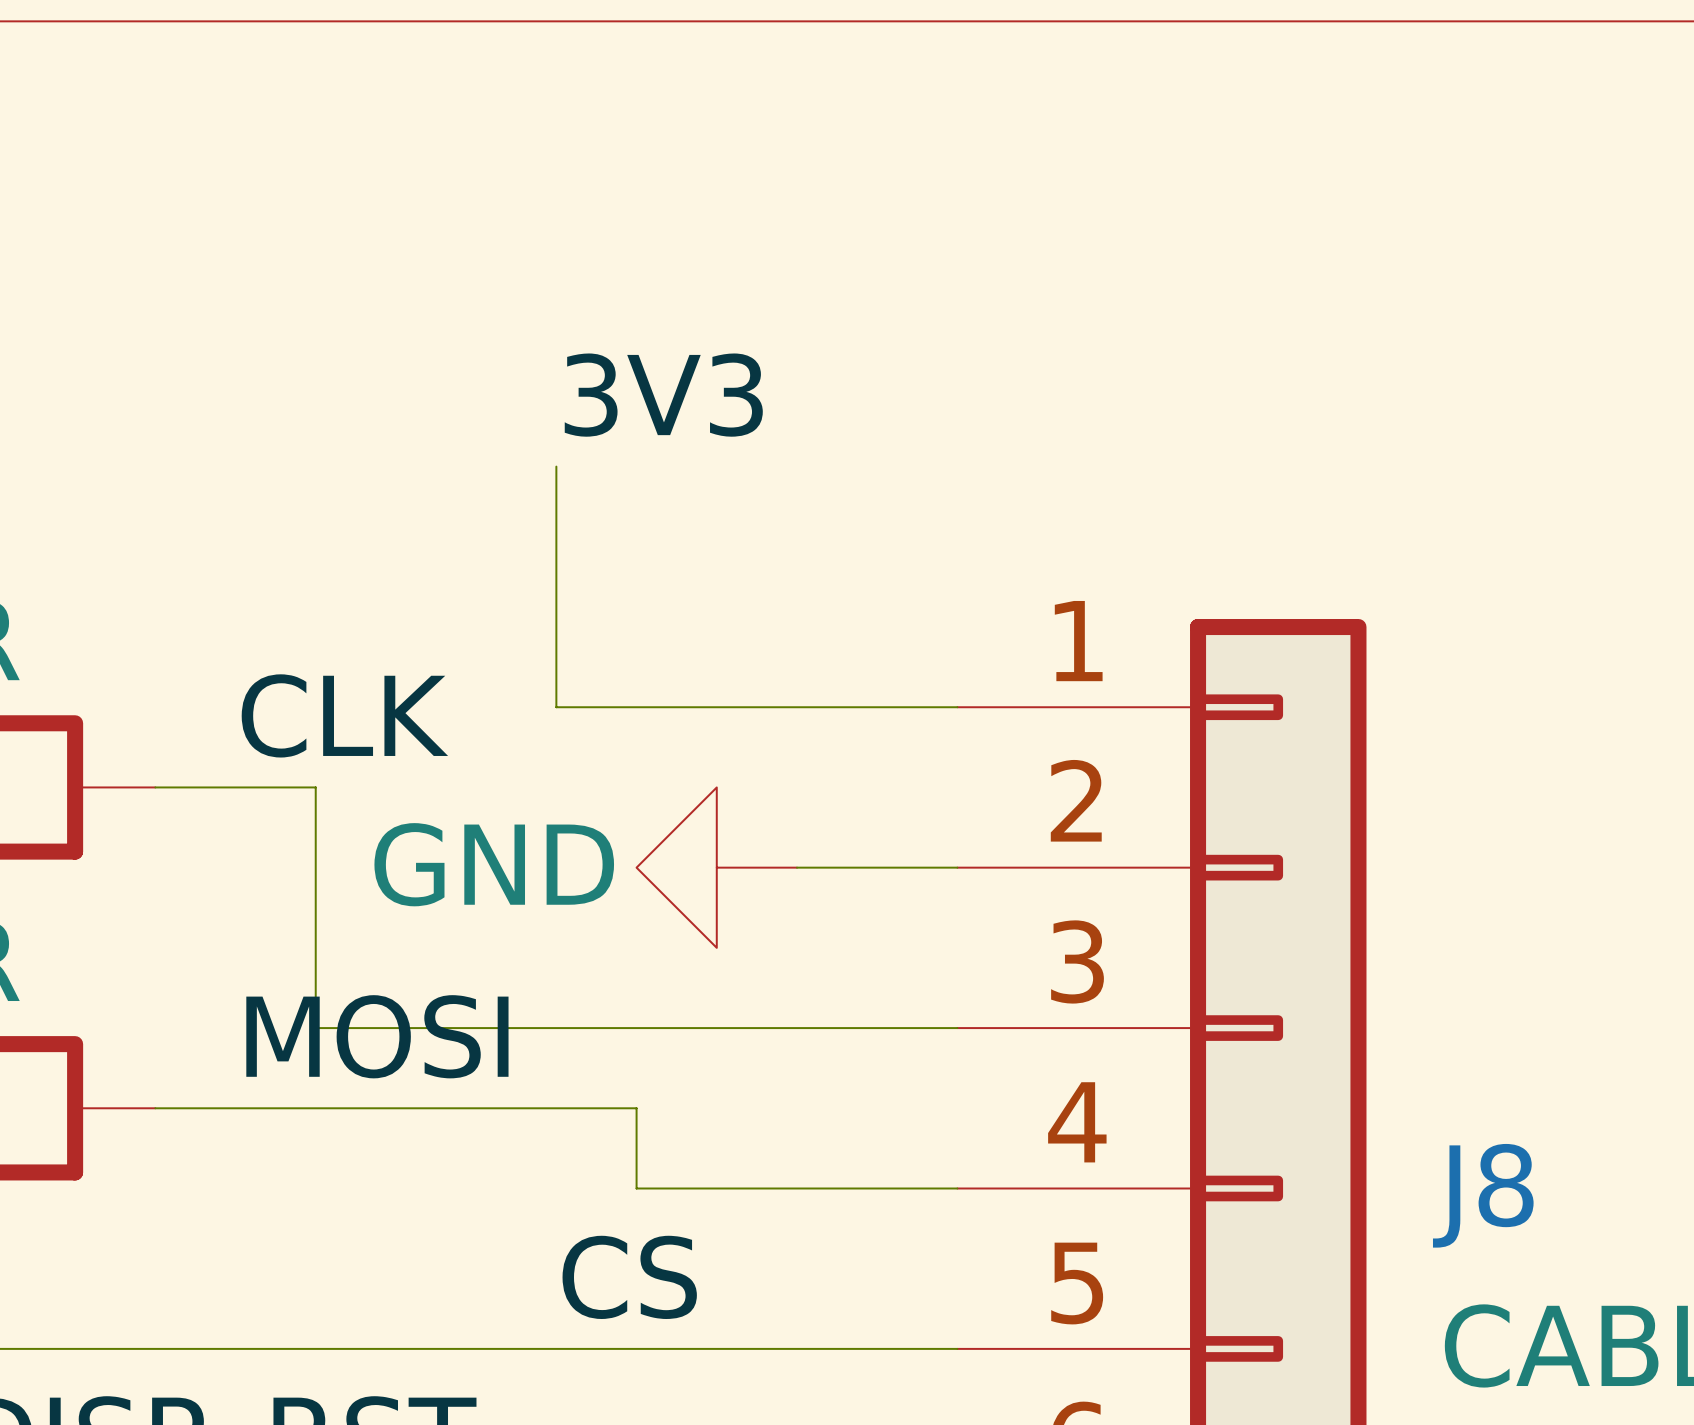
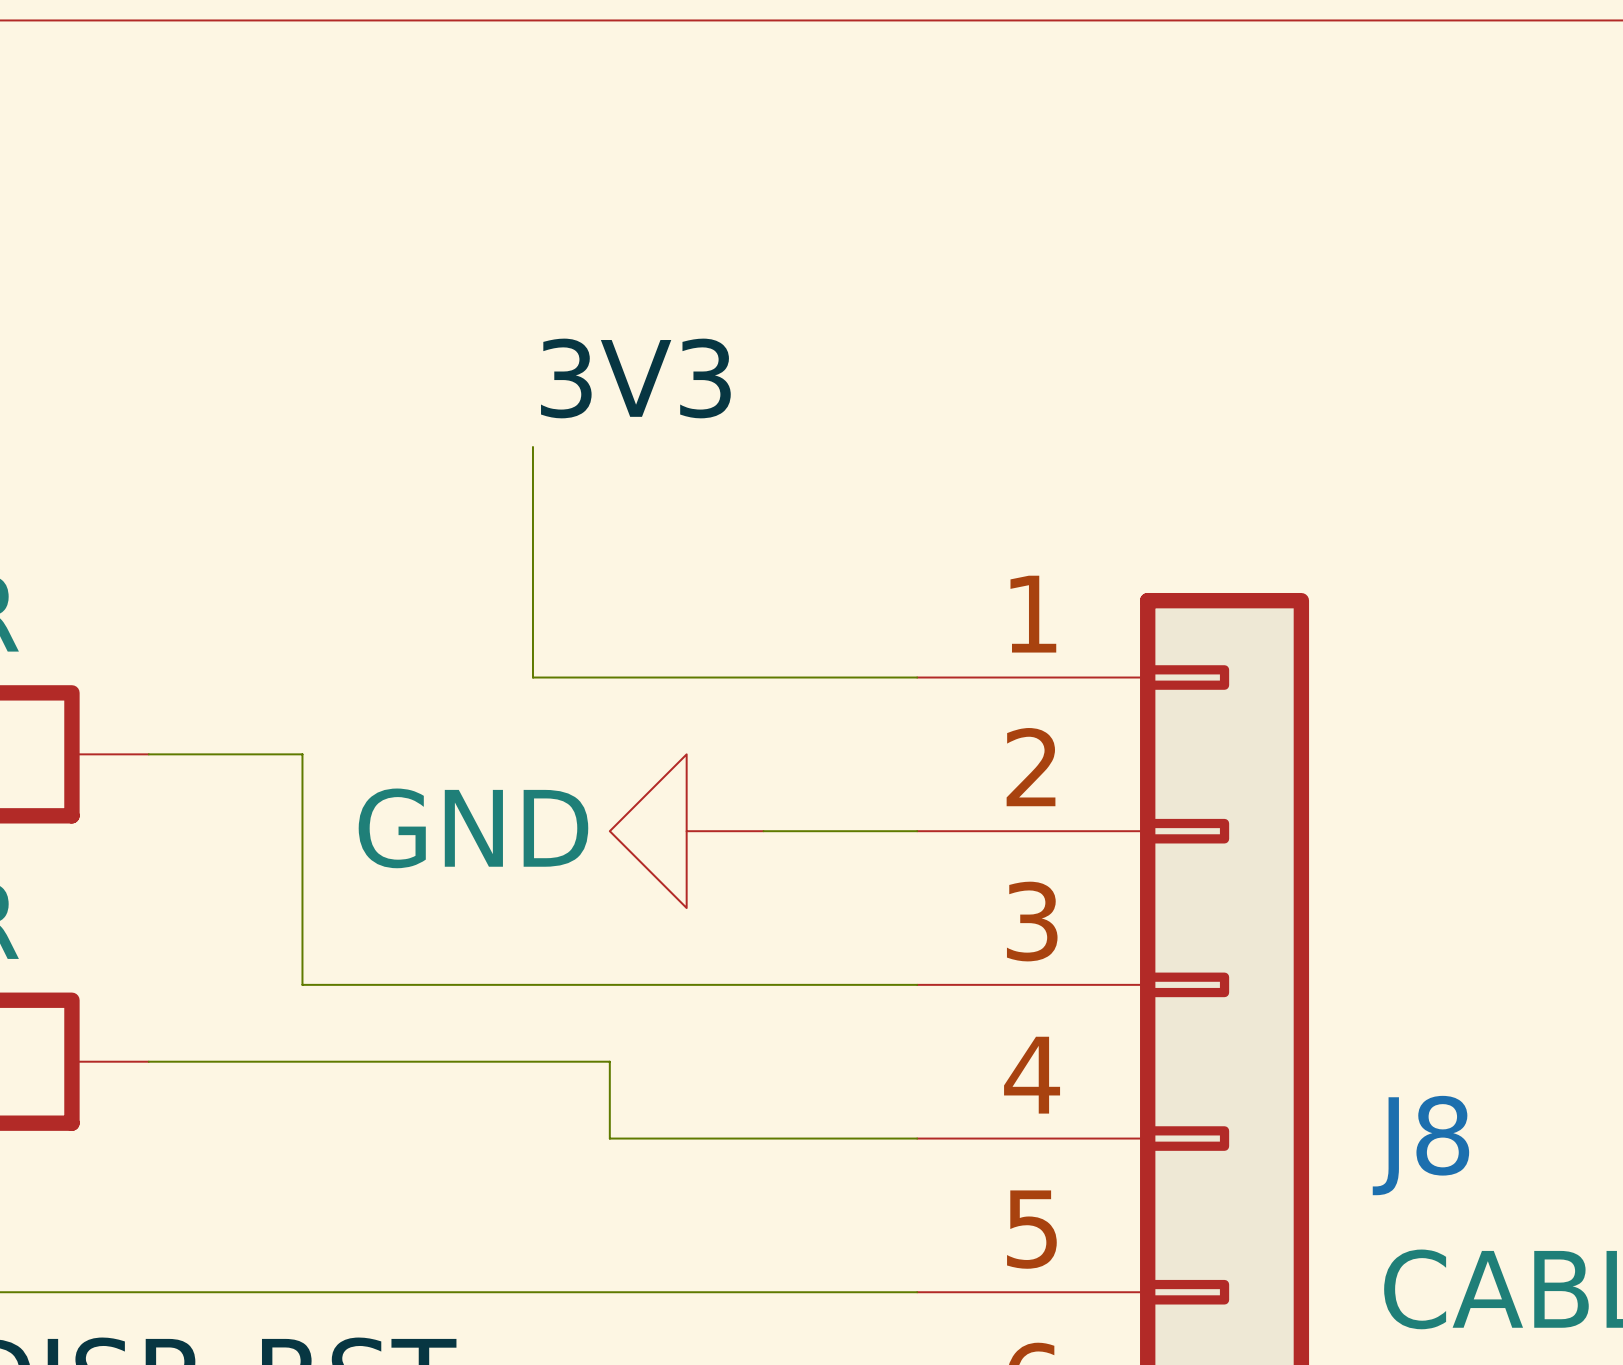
label: CLK (344, 715) -> none
label: MOSI (377, 1036) -> none
label: CS (629, 1277) -> none

